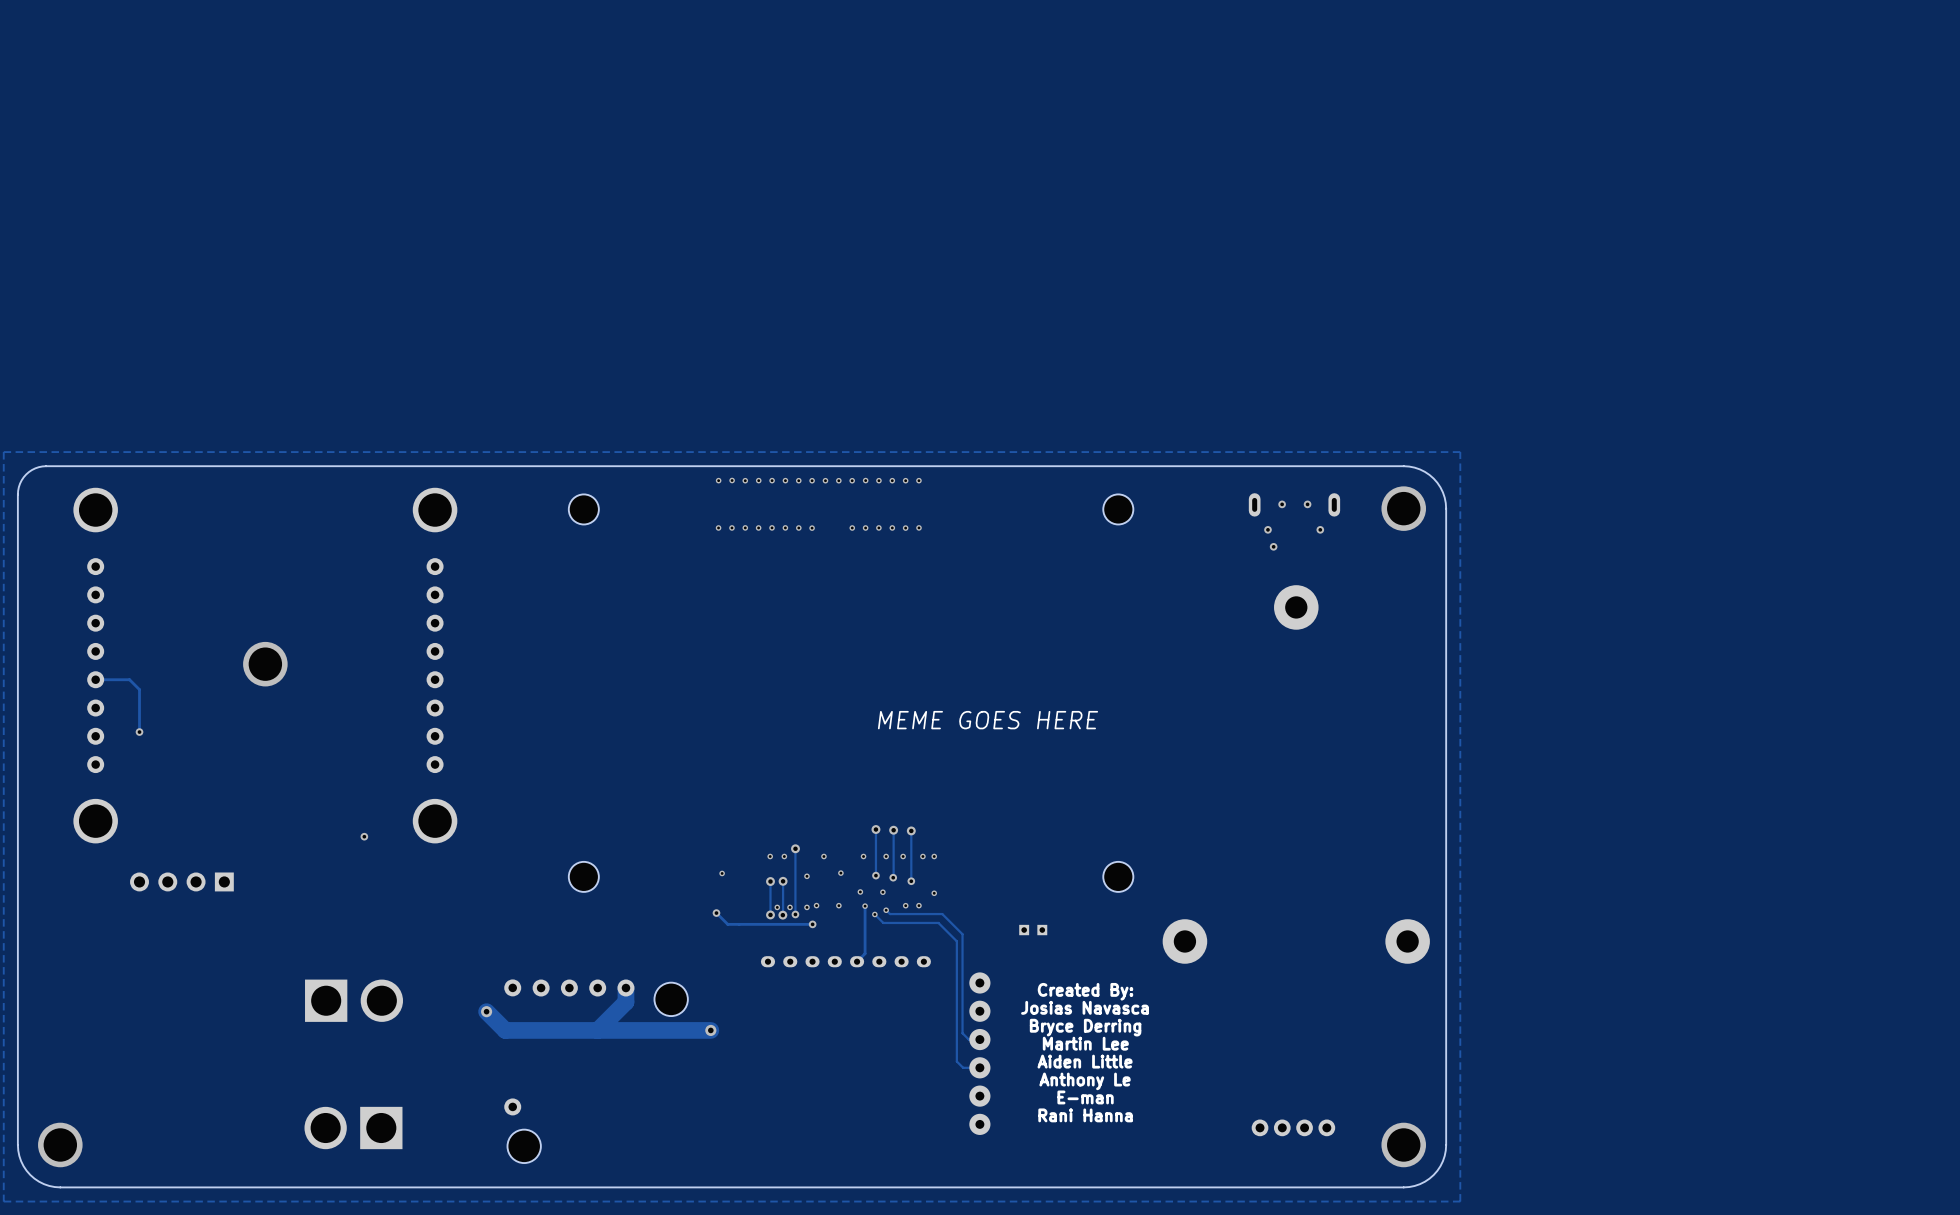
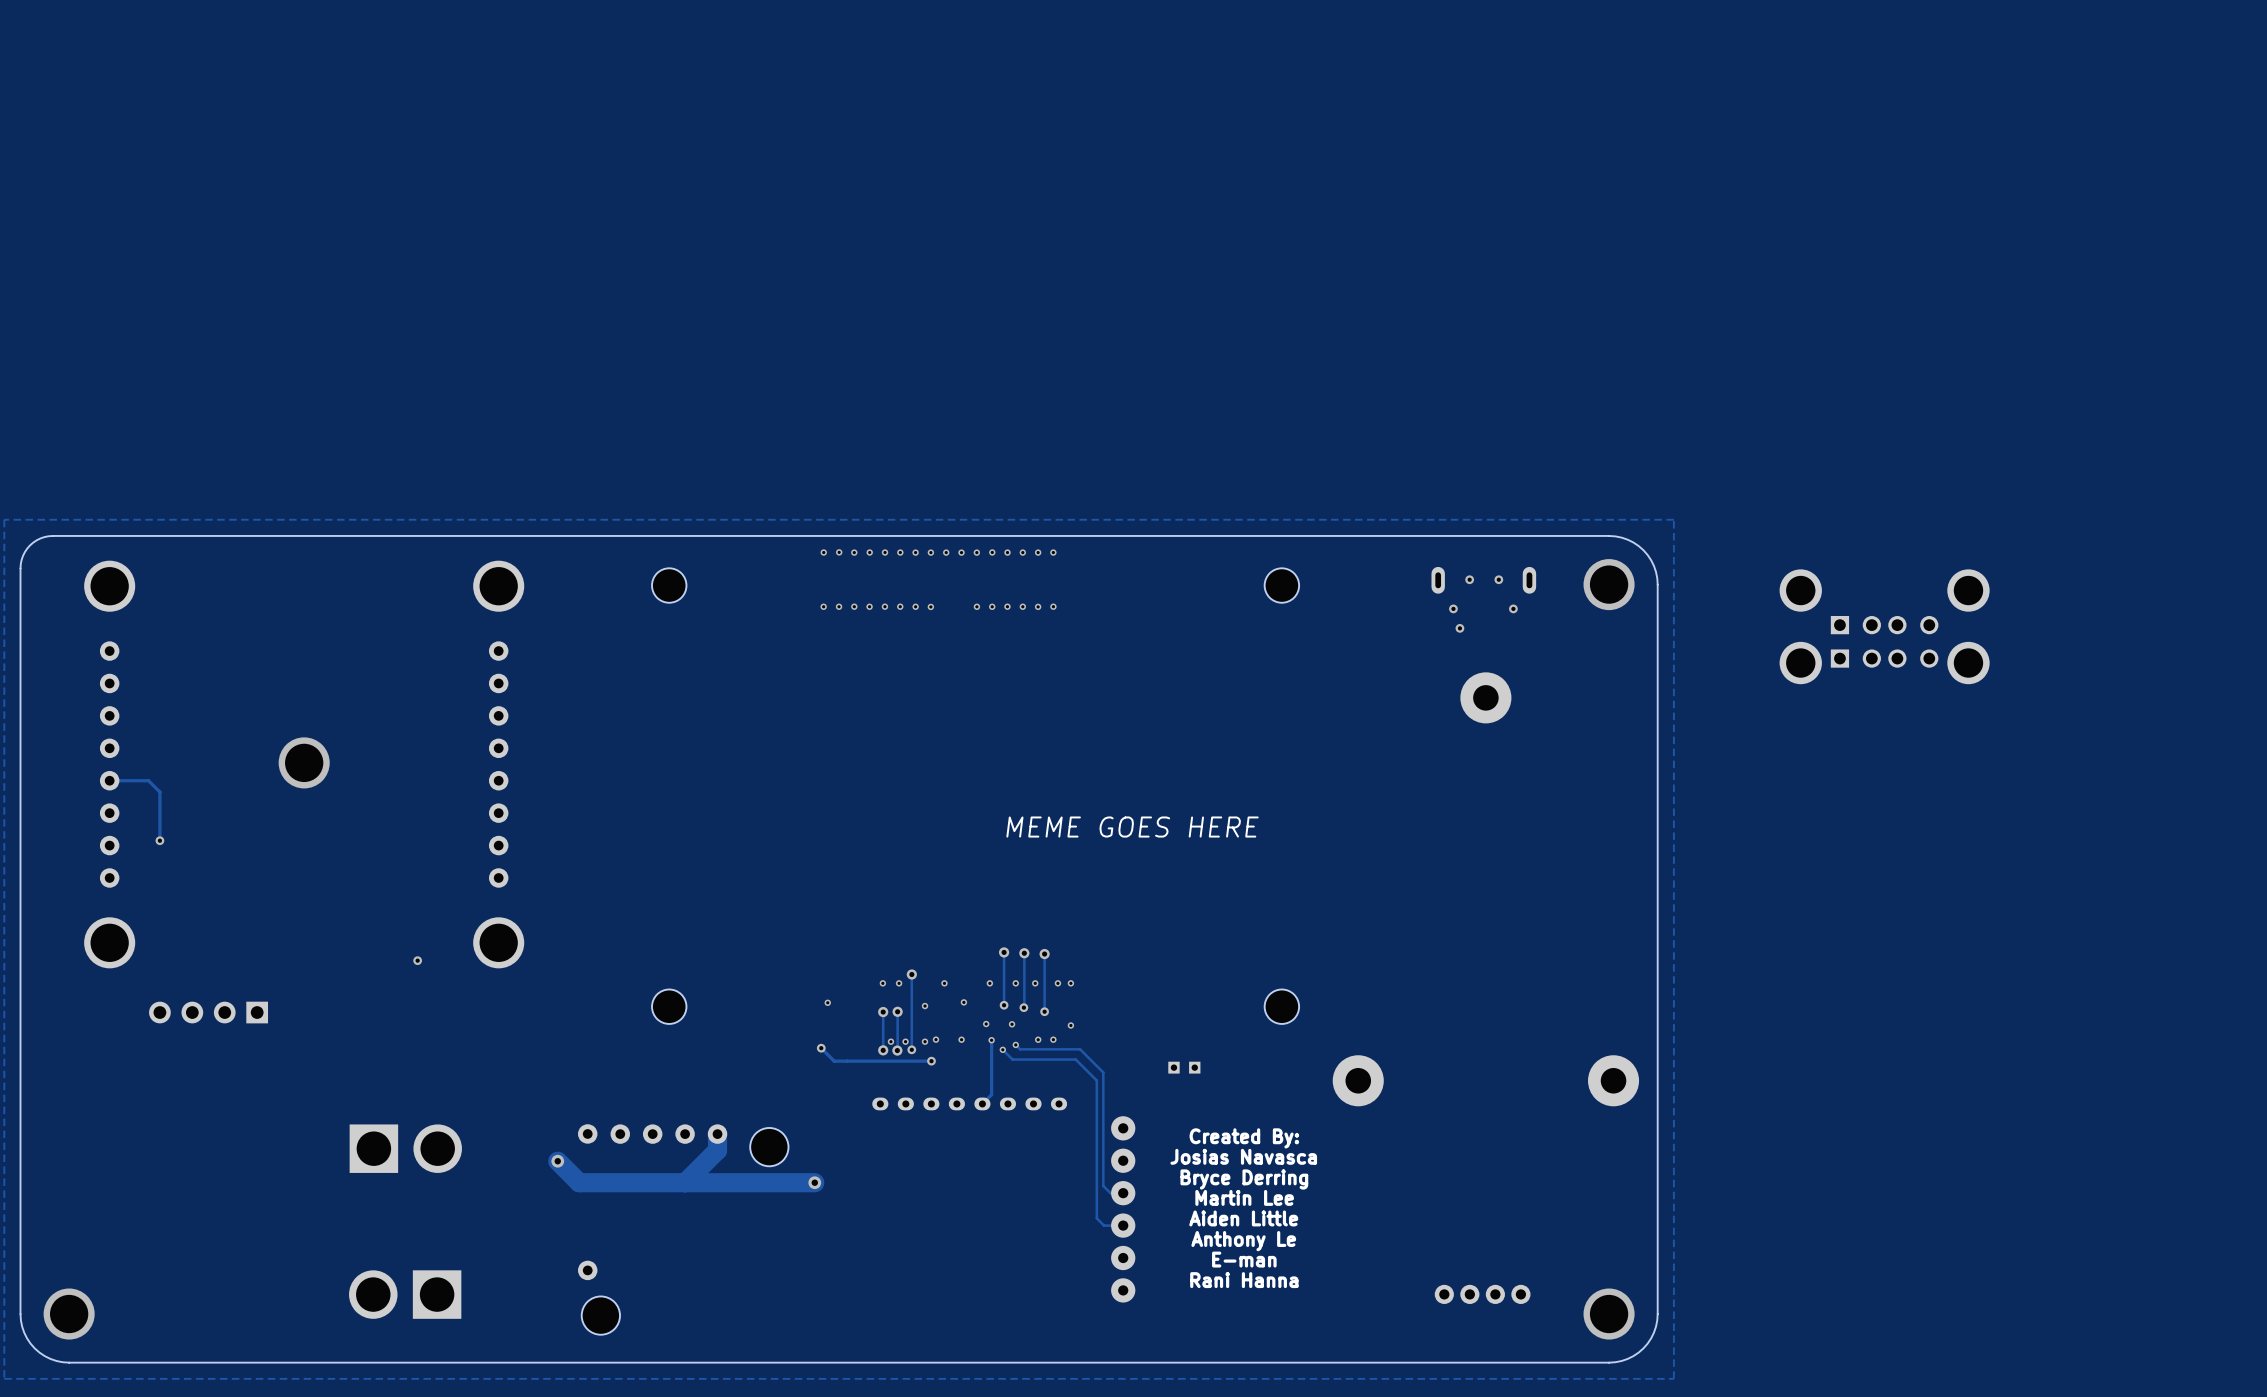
part: none -> (1884, 626)

